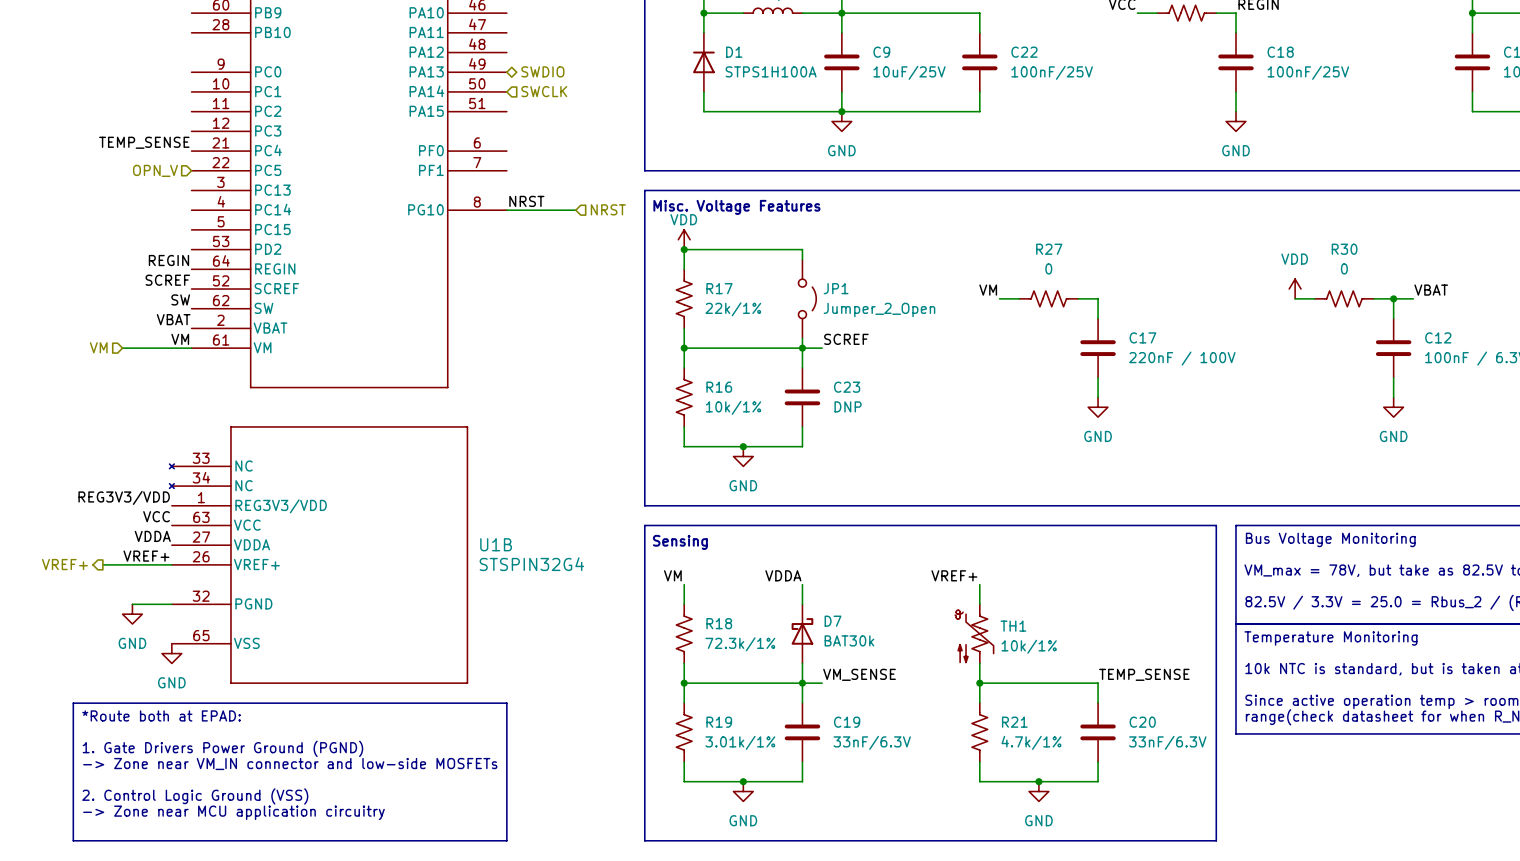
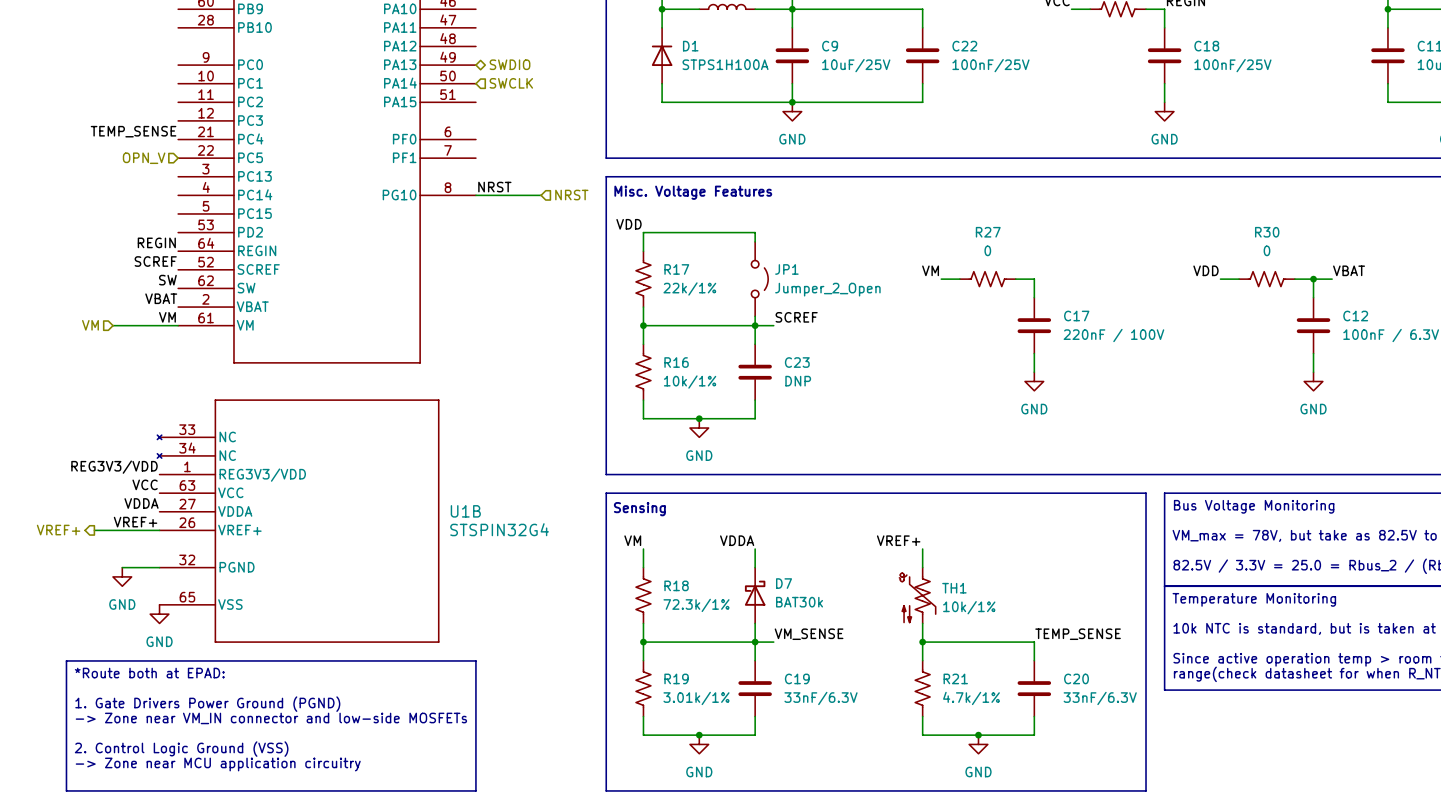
power symbol: VDD (684, 239) -> none
label: none -> VDD (628, 224)
junction: (684, 249) -> none
power symbol: VDD (1295, 289) -> none
label: none -> VDD (1205, 270)

